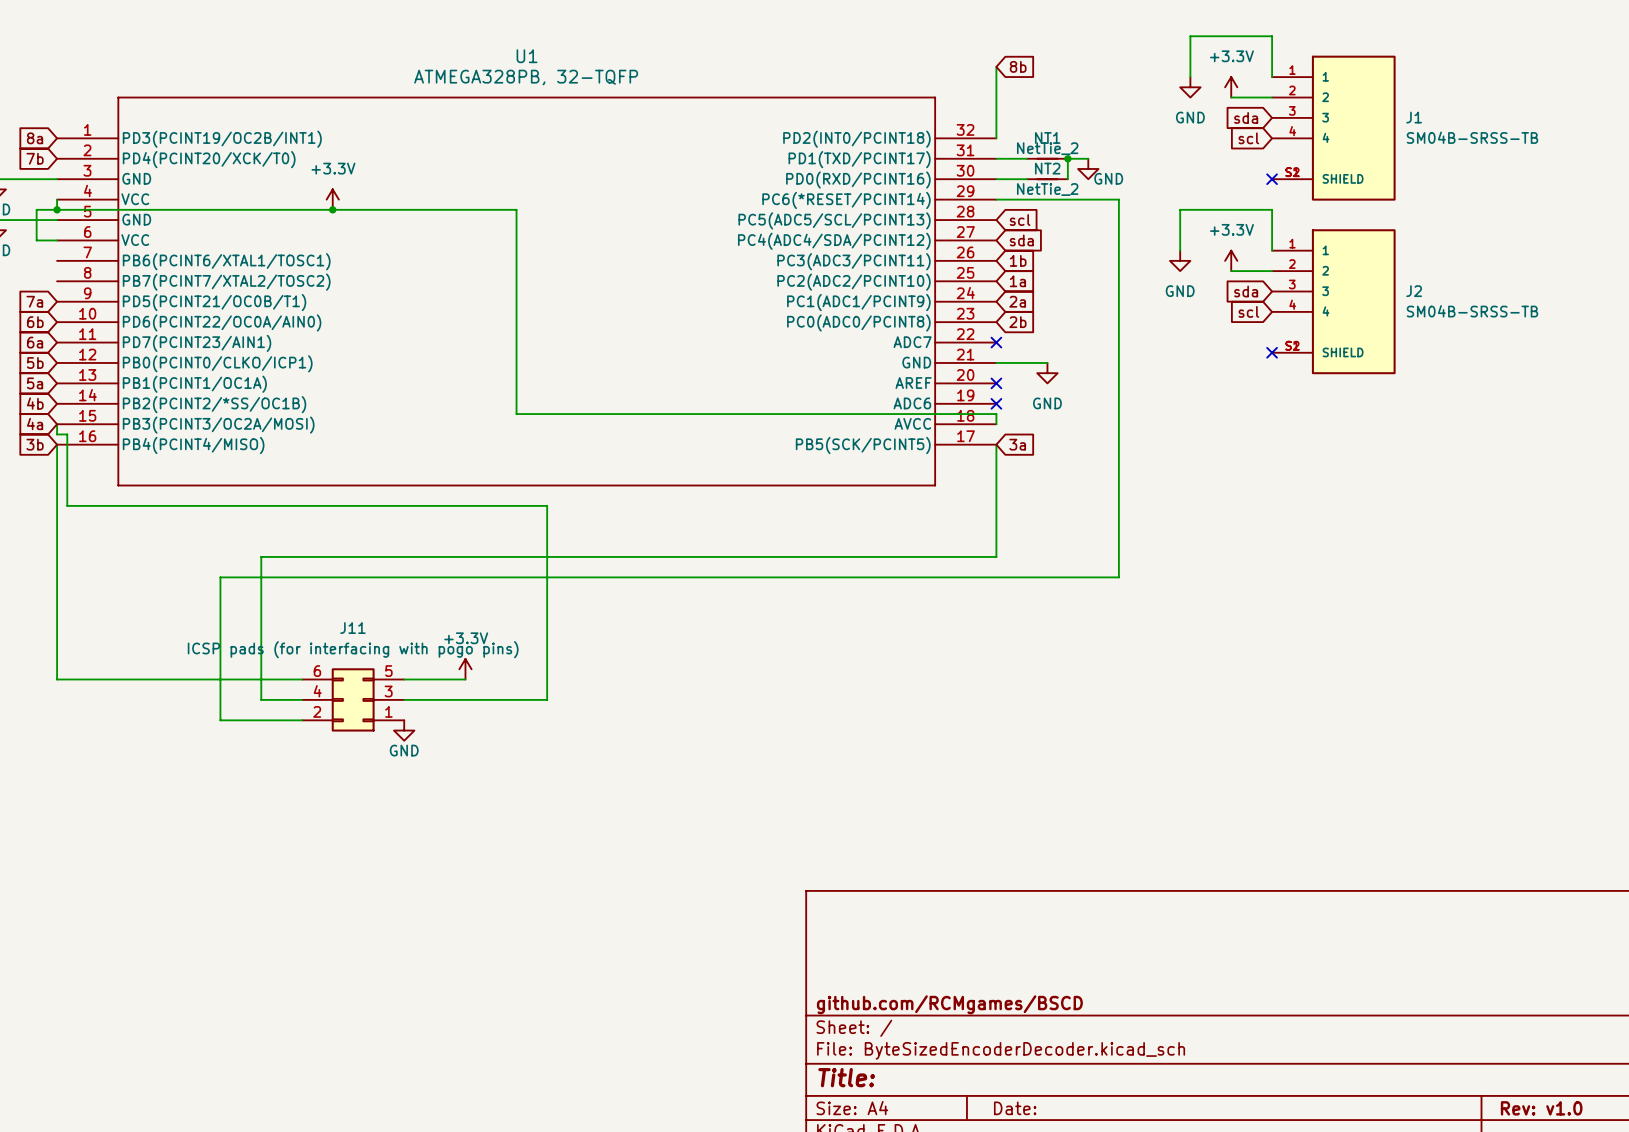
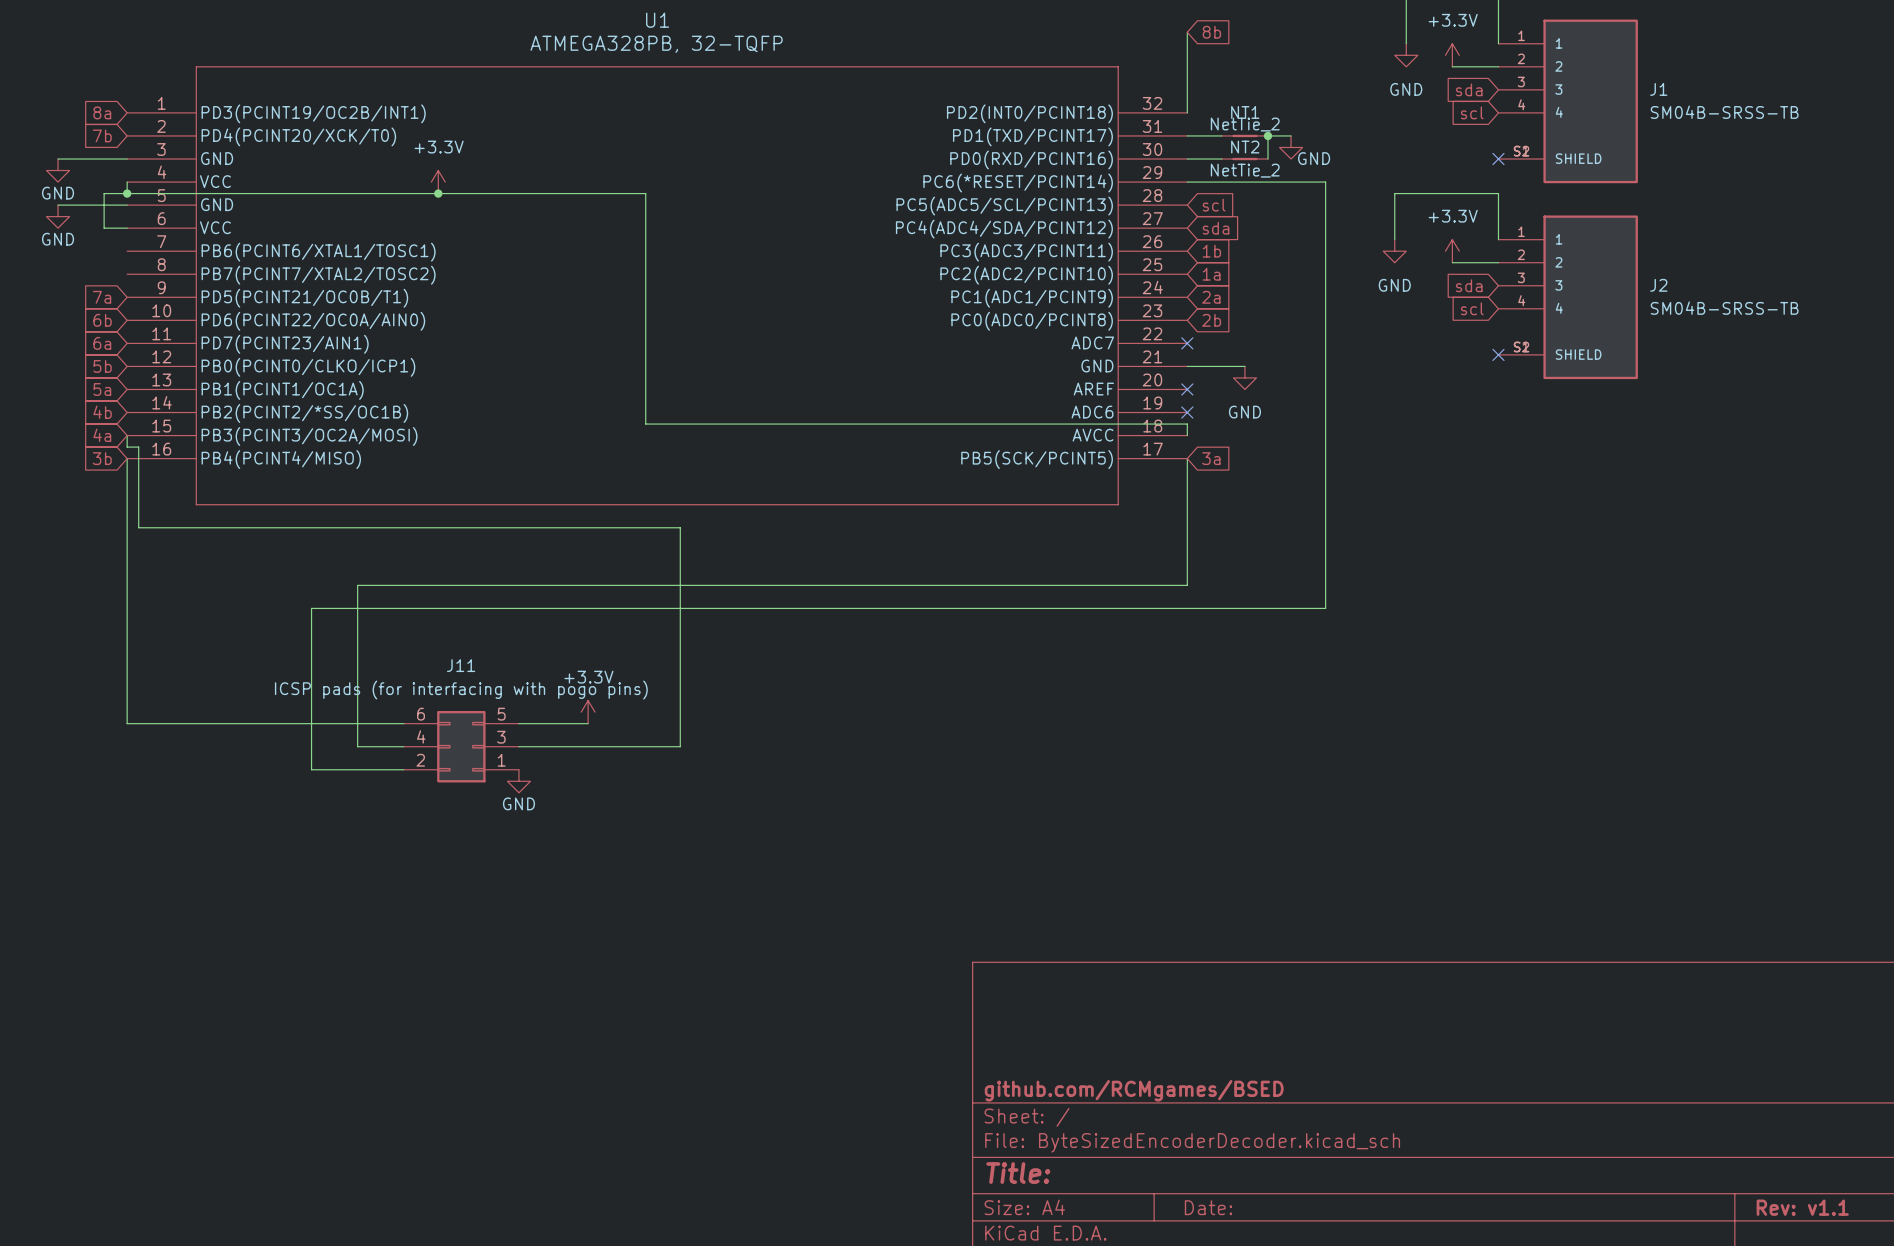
title block: github.com/RCMgames/BSCD (949, 1004) -> github.com/RCMgames/BSED (1134, 1090)
title block: Rev: v1.0 (1541, 1108) -> Rev: v1.1 (1802, 1207)

